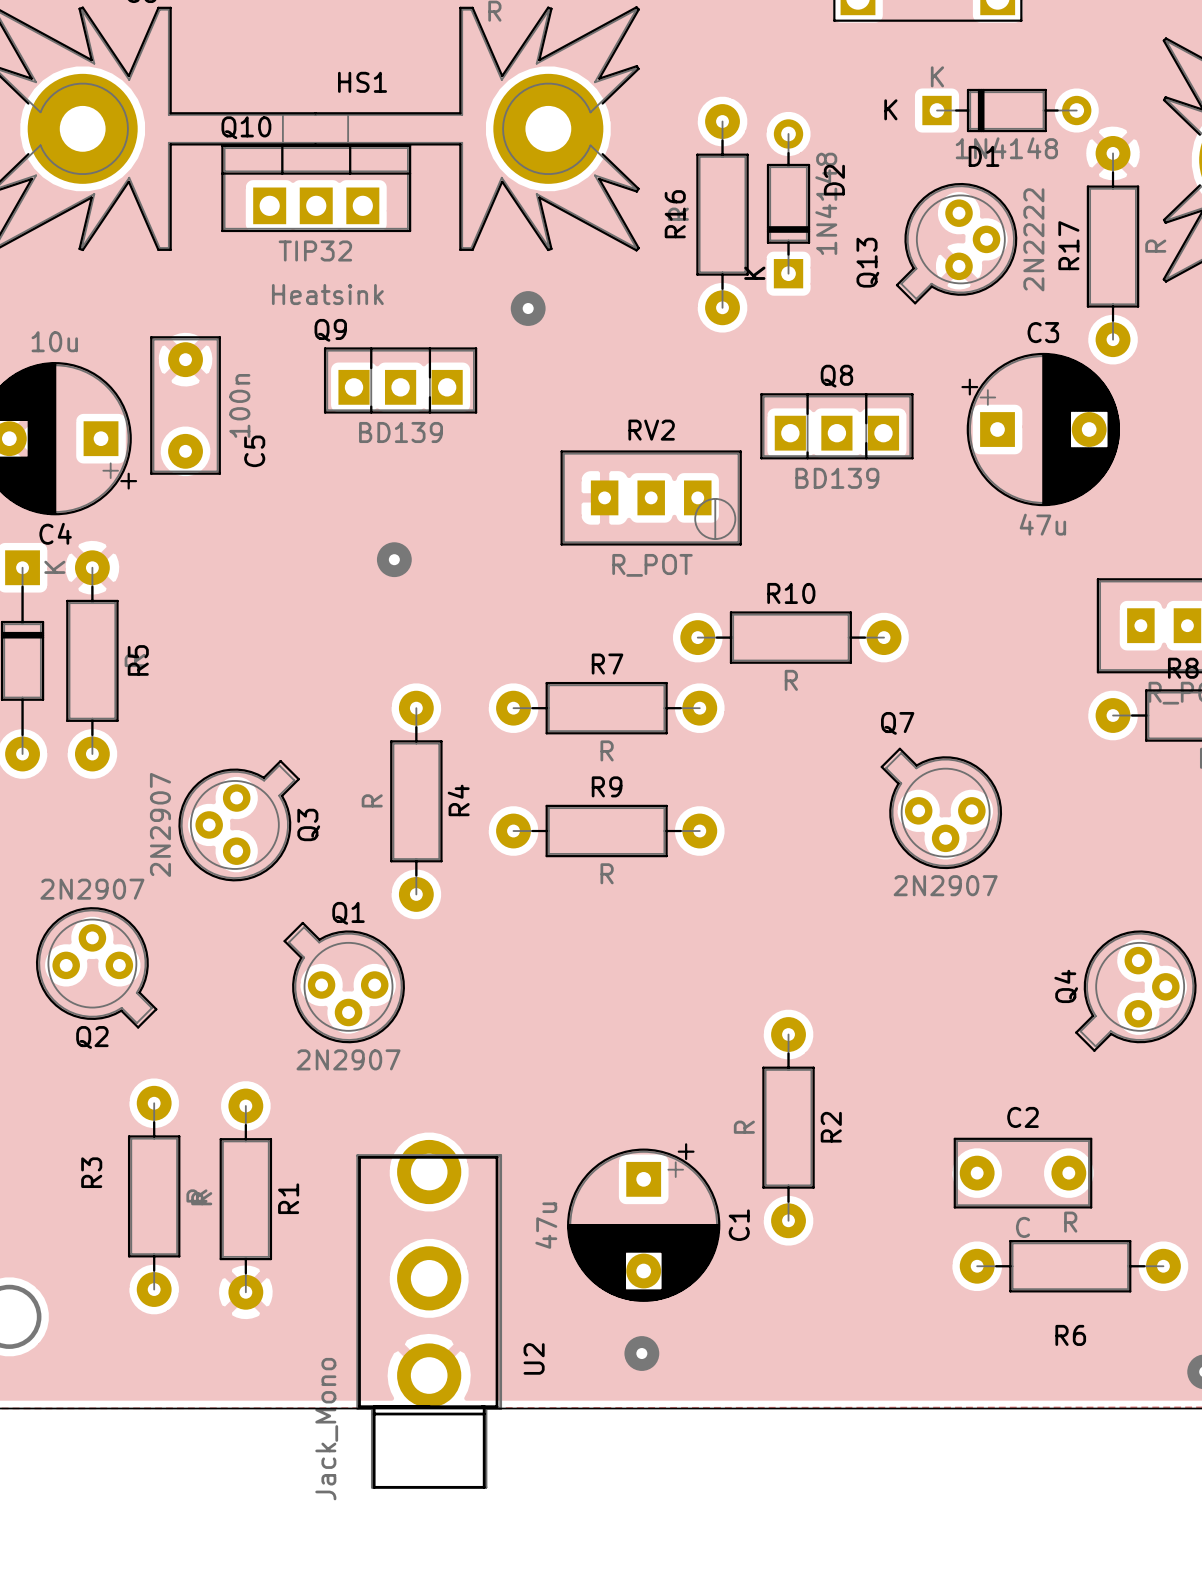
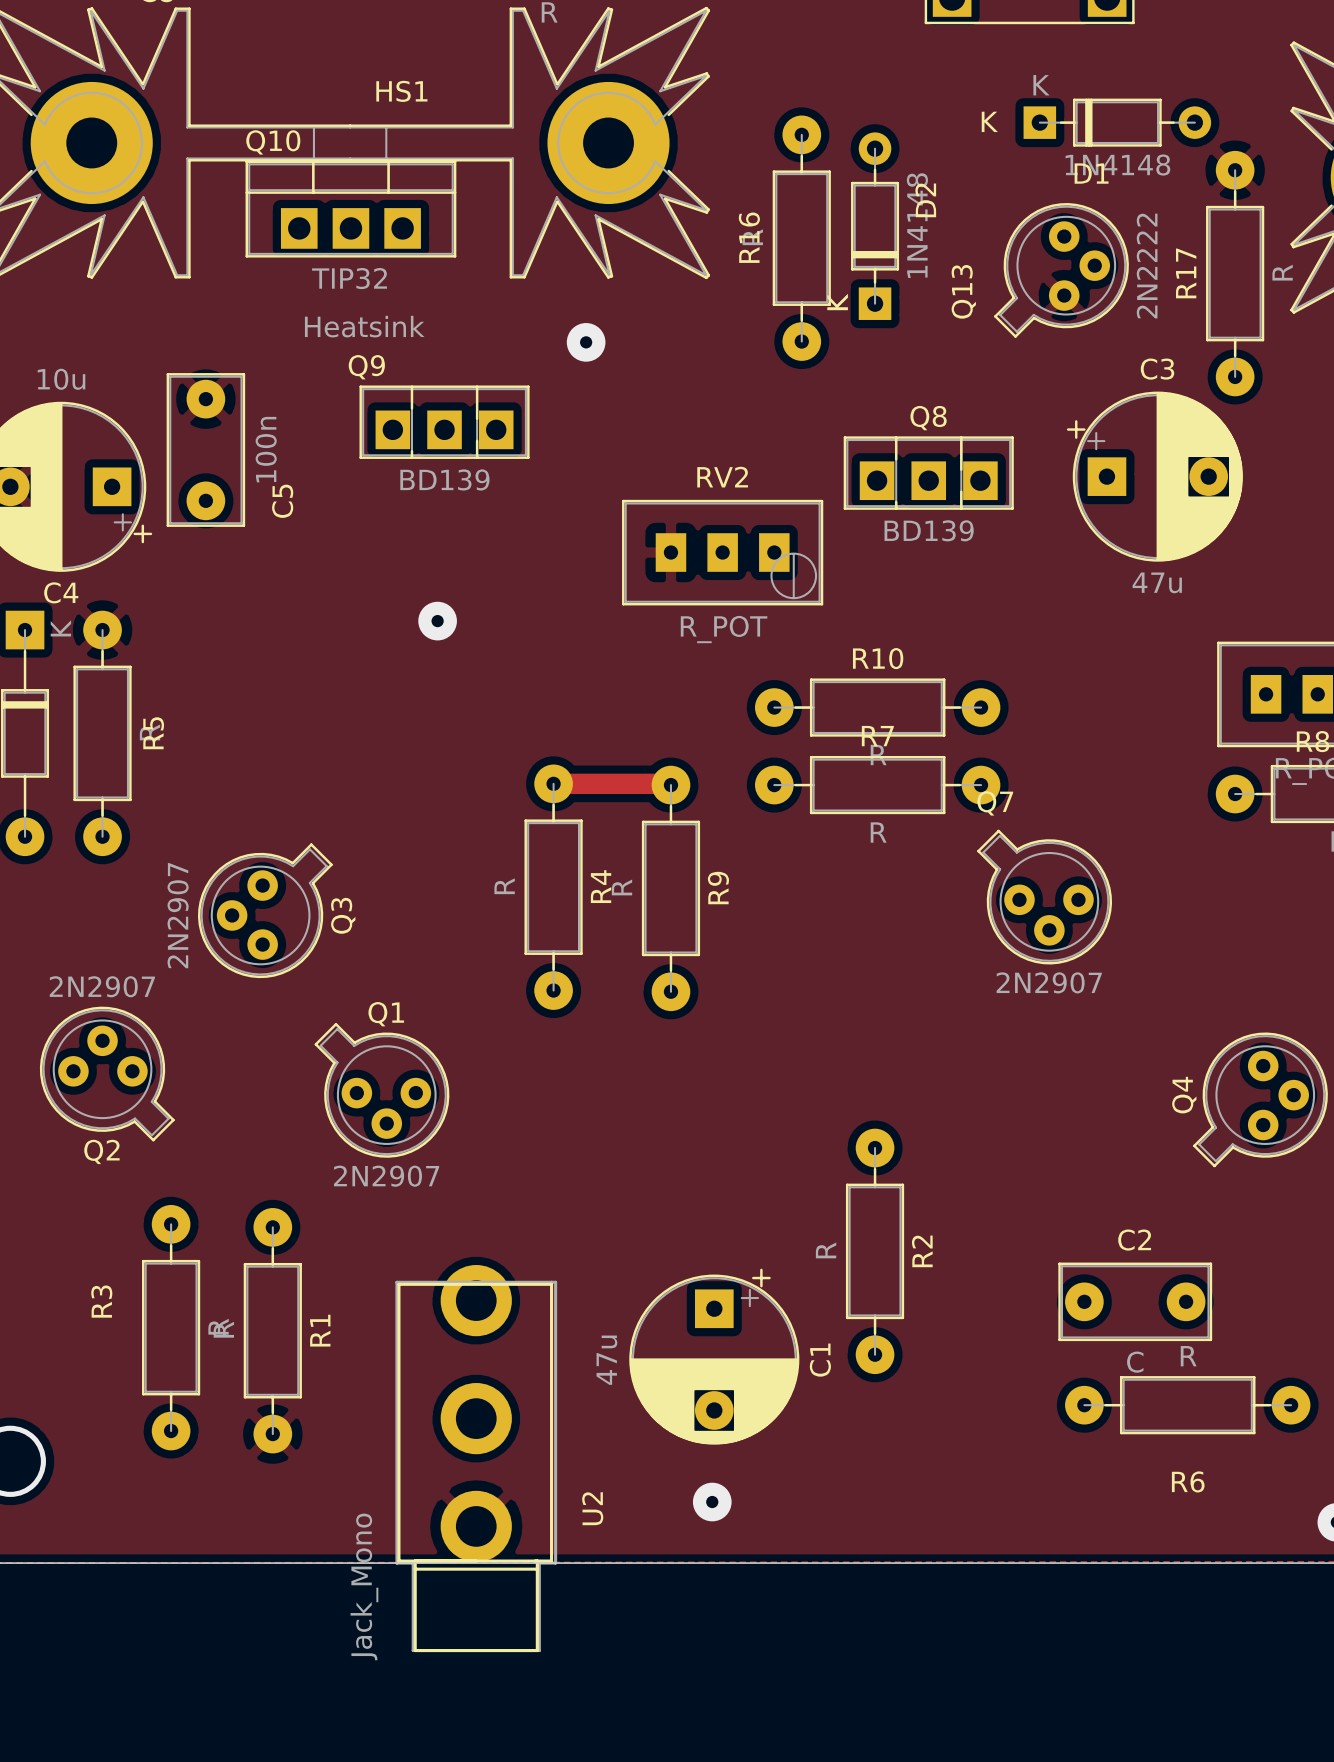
track: none -> (553, 783) (669, 783)
R7 position: (606, 708) -> (877, 785)
R4 position: (416, 801) -> (553, 887)
R9 rotation: 0° (606, 831) -> 90° clockwise (670, 888)

